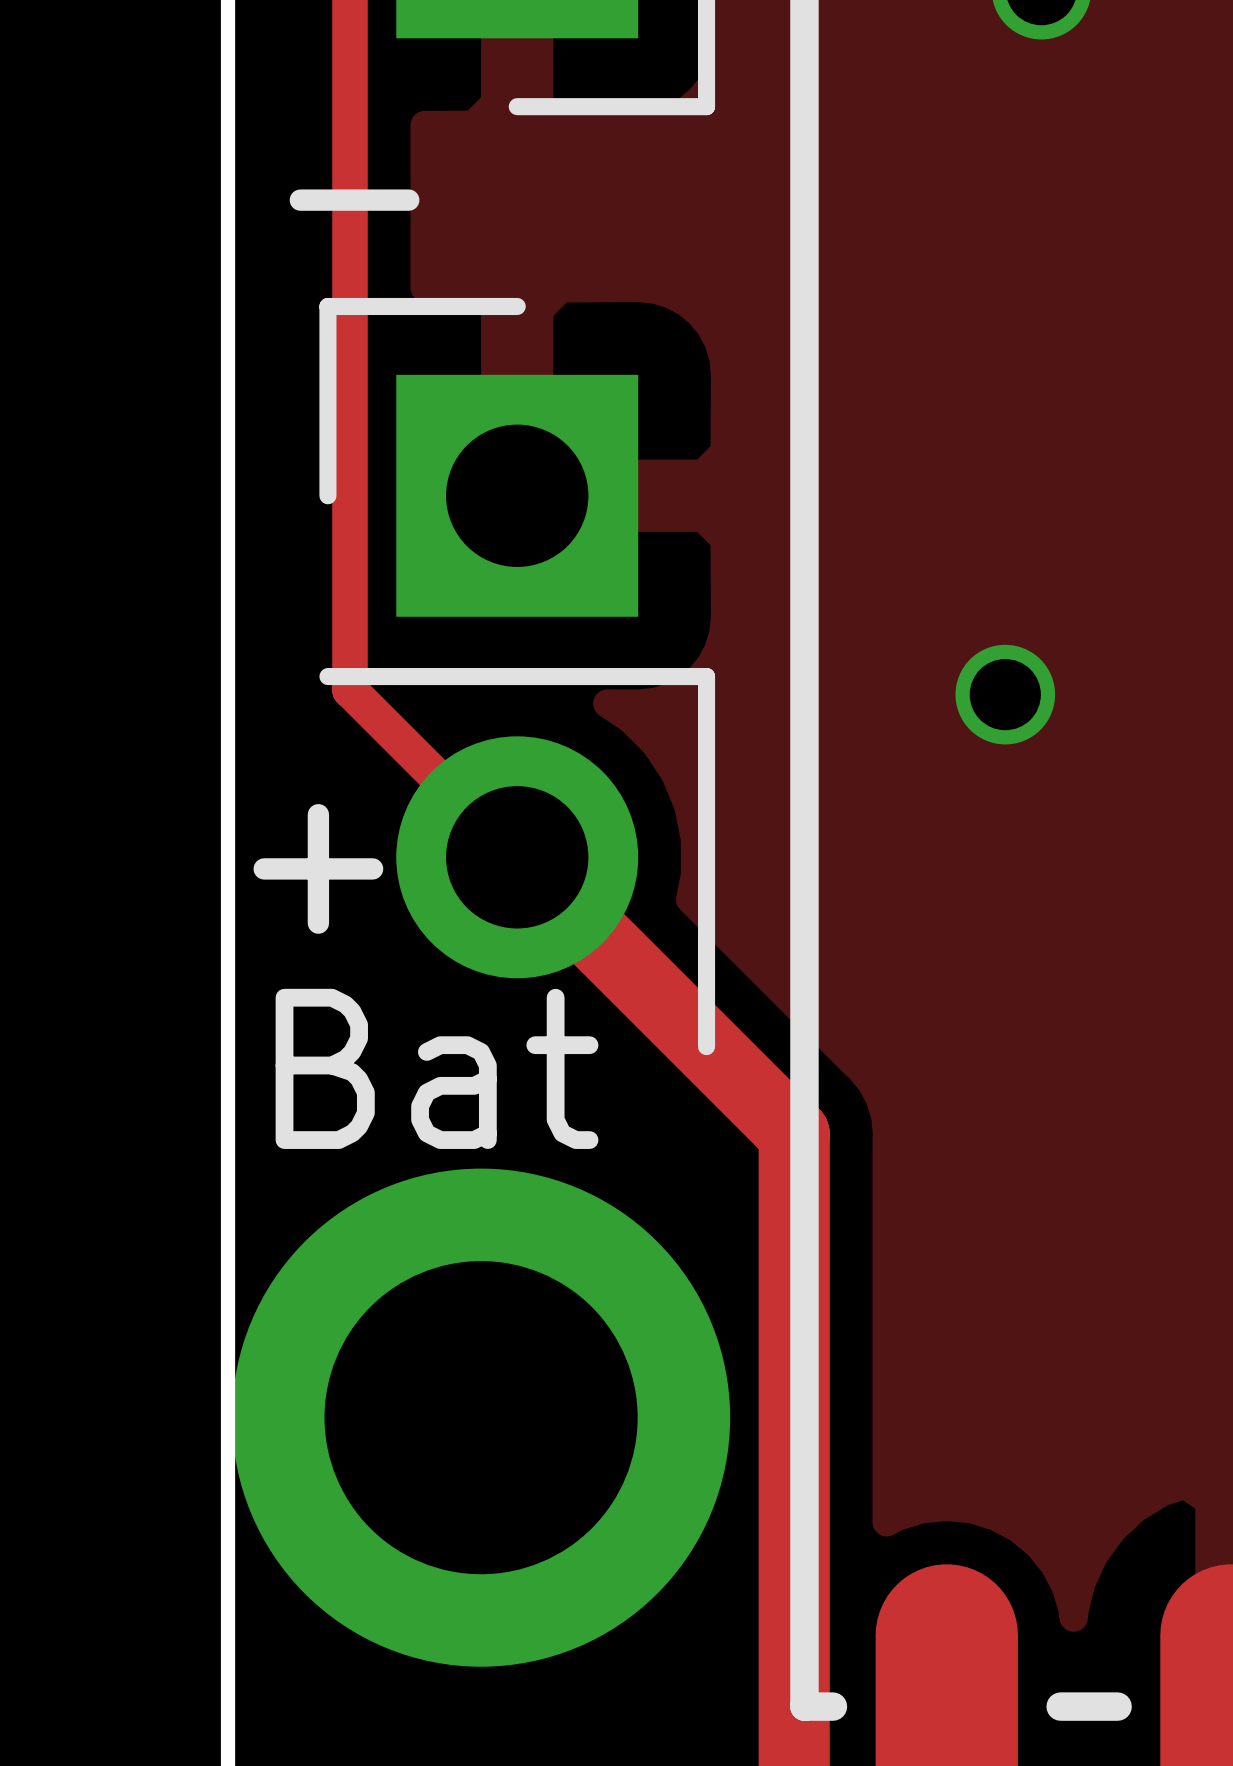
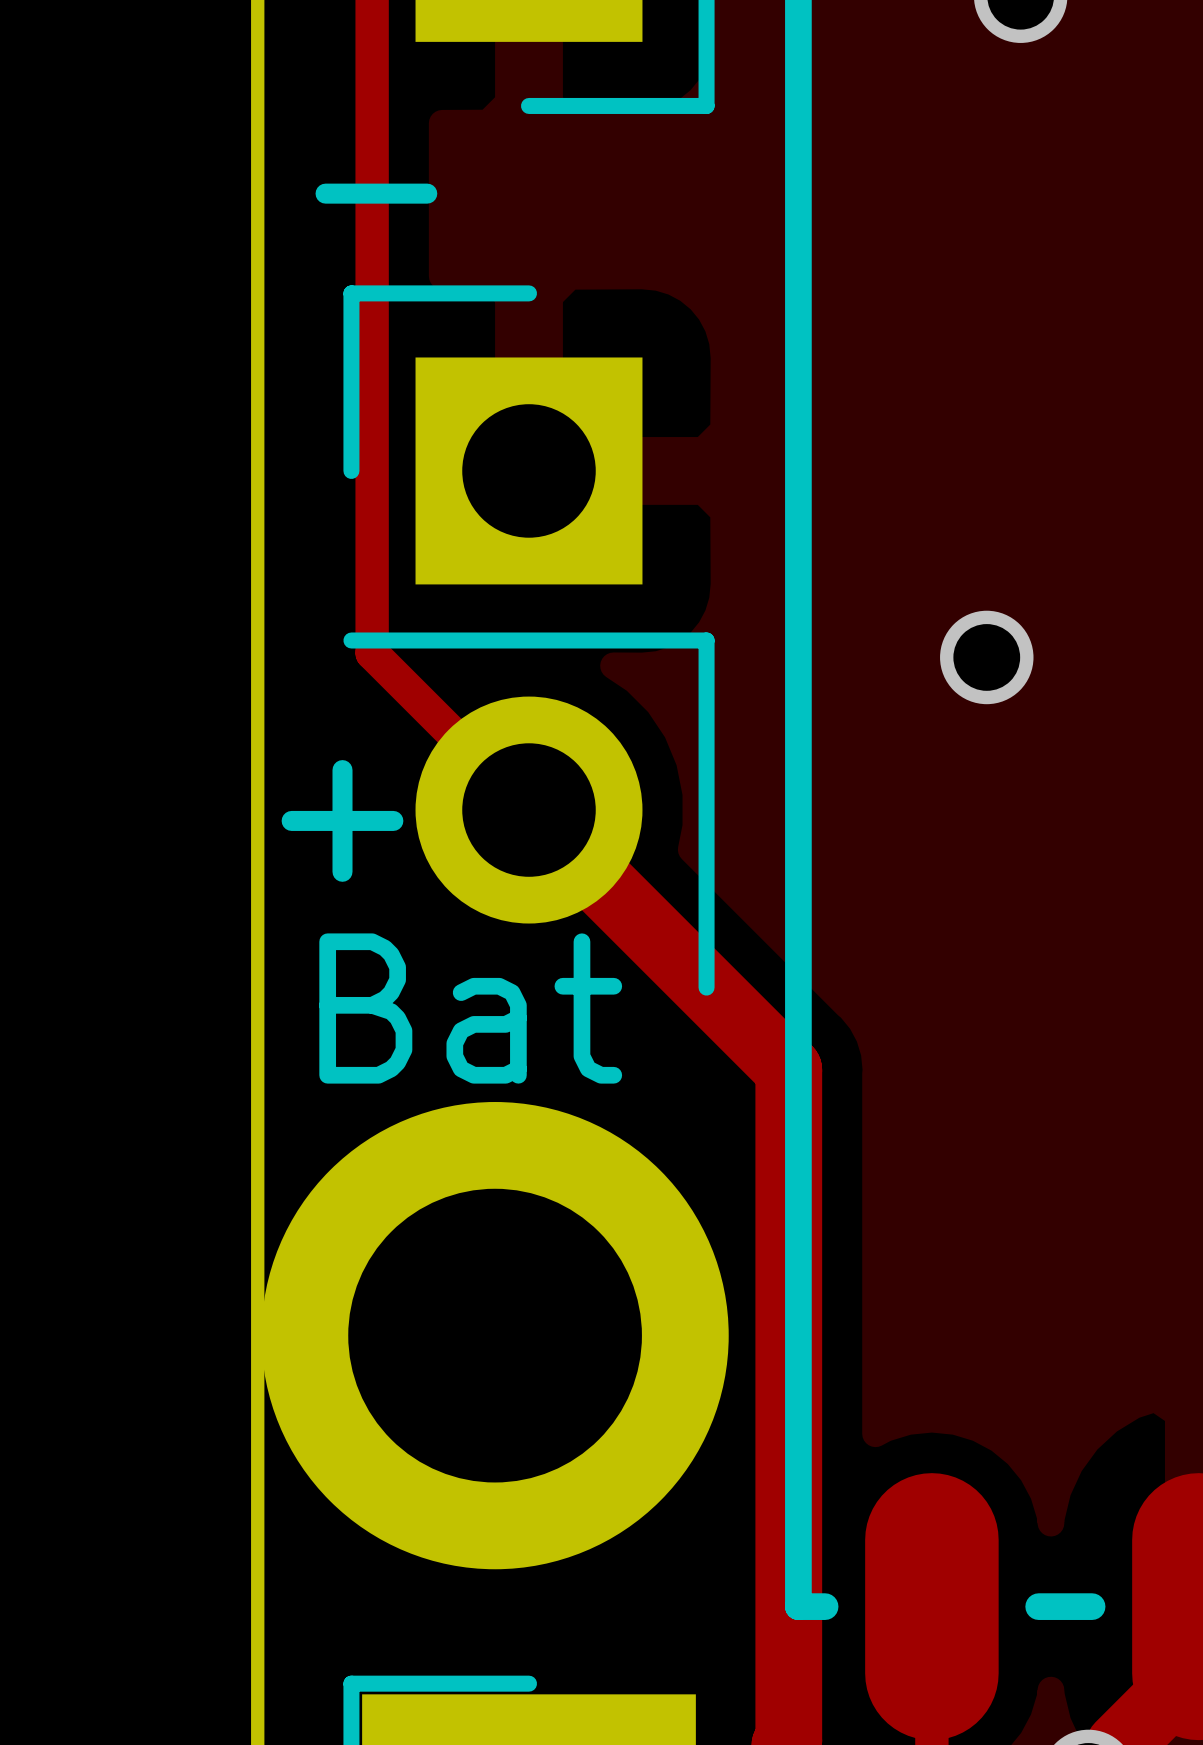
text position: Bat (437, 1068) -> Bat (470, 1008)

